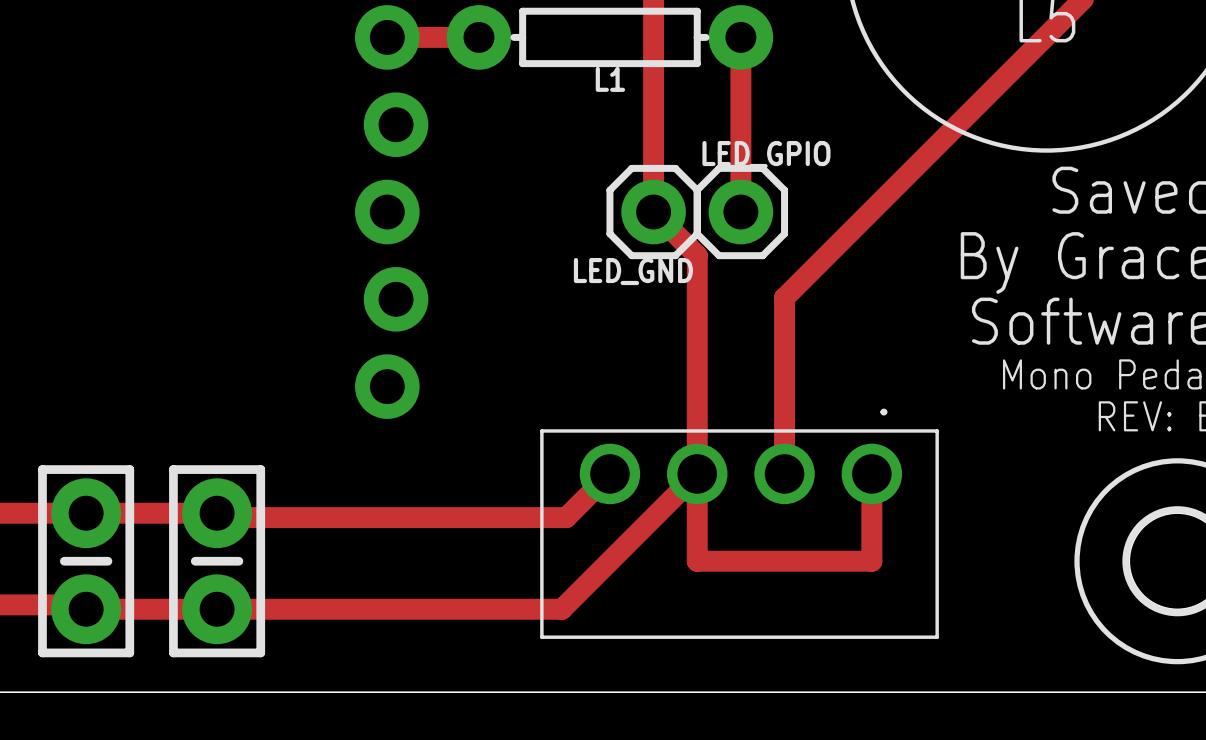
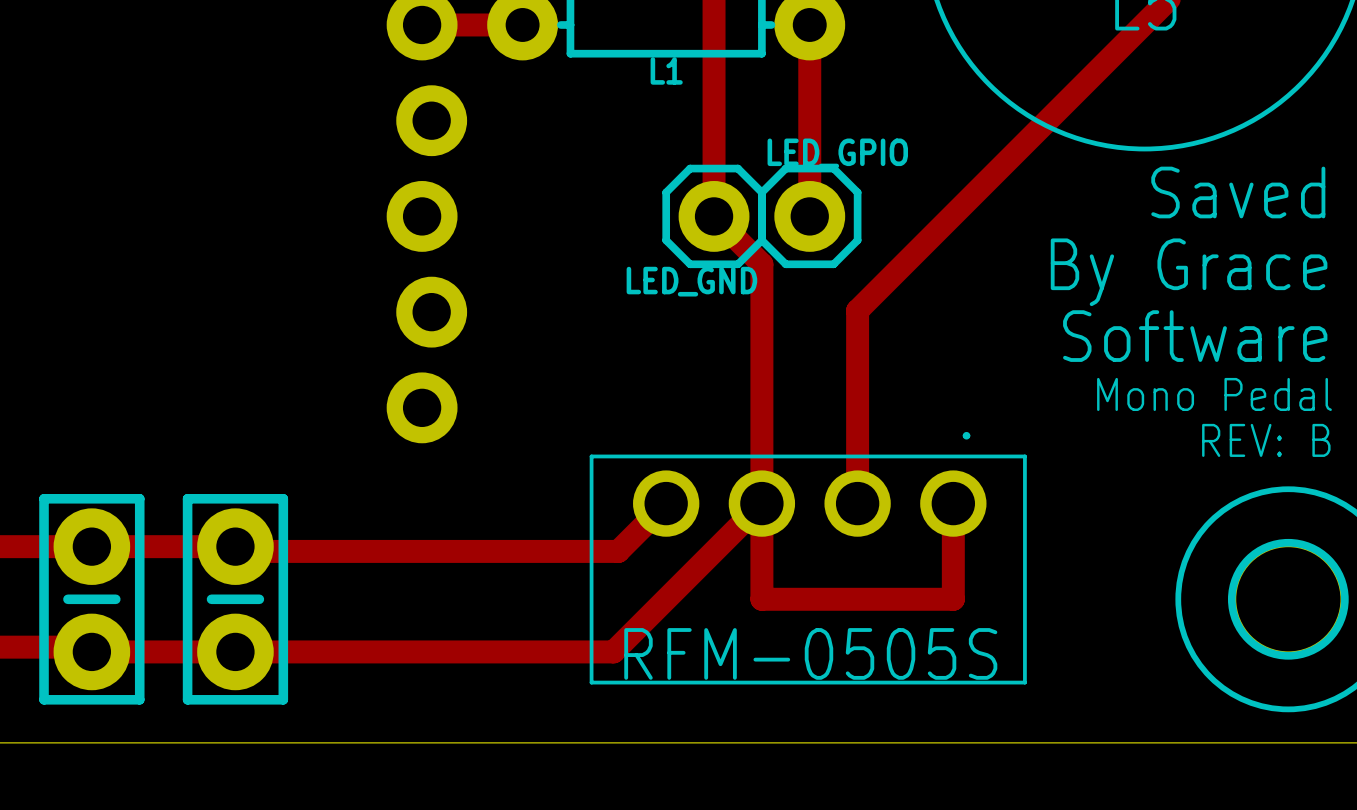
part value: none -> RFM-0505S (810, 653)

